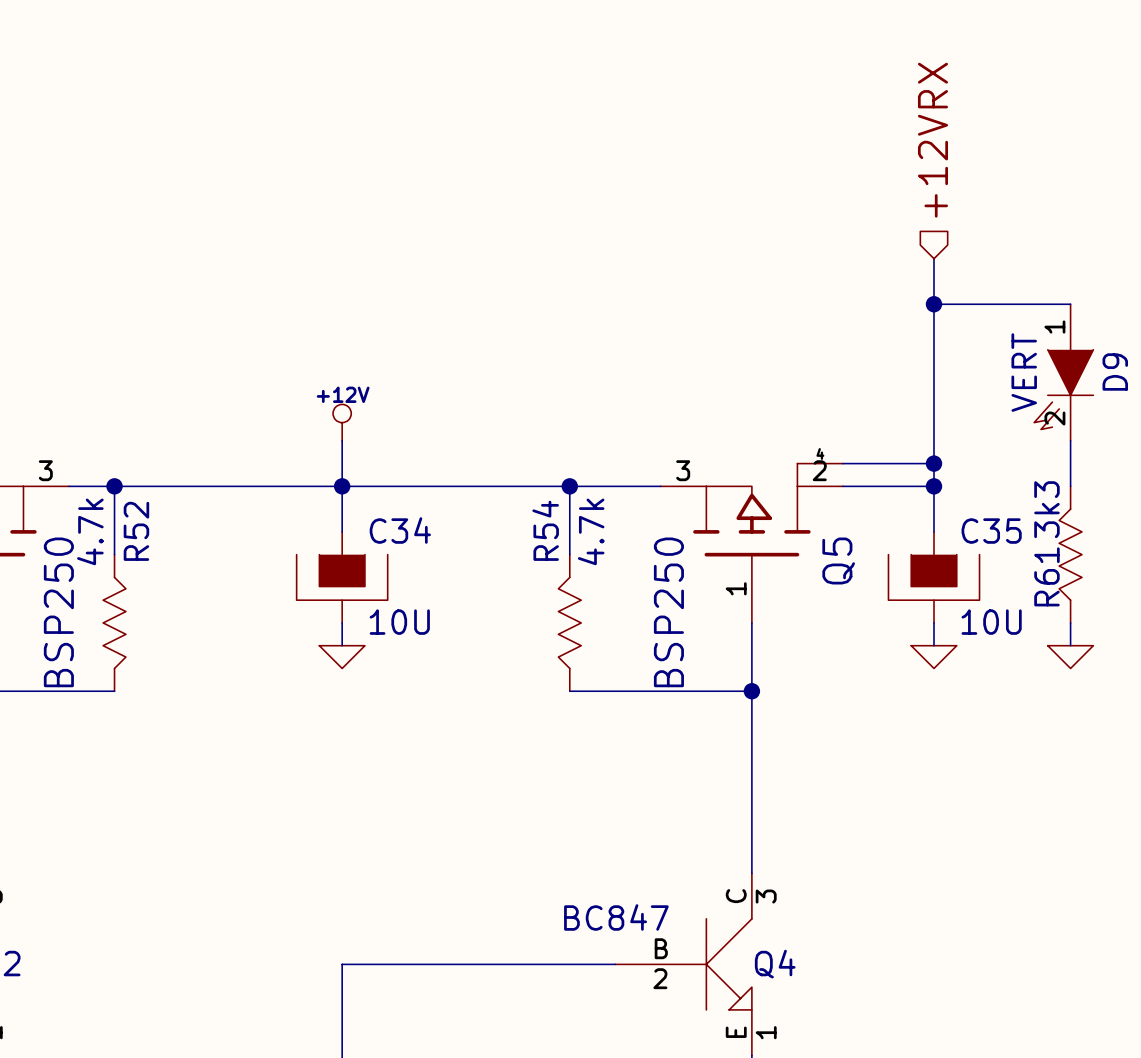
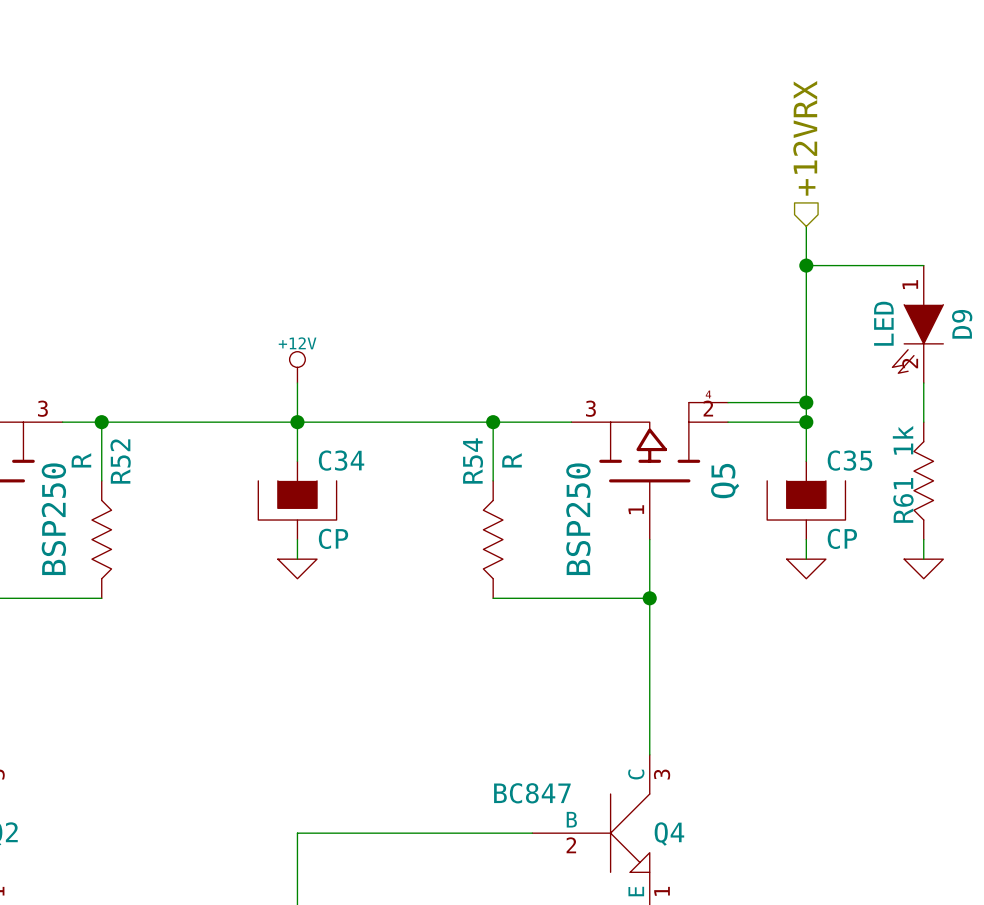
D9 value: VERT (1024, 372) -> LED (883, 323)
R61 value: 3k3 (1046, 509) -> 1k (903, 440)
R52 value: 4.7k (90, 531) -> R (81, 460)
R54 value: 4.7k (591, 531) -> R (512, 460)
C34 value: 10U (399, 622) -> CP (333, 538)
C35 value: 10U (991, 622) -> CP (842, 538)

